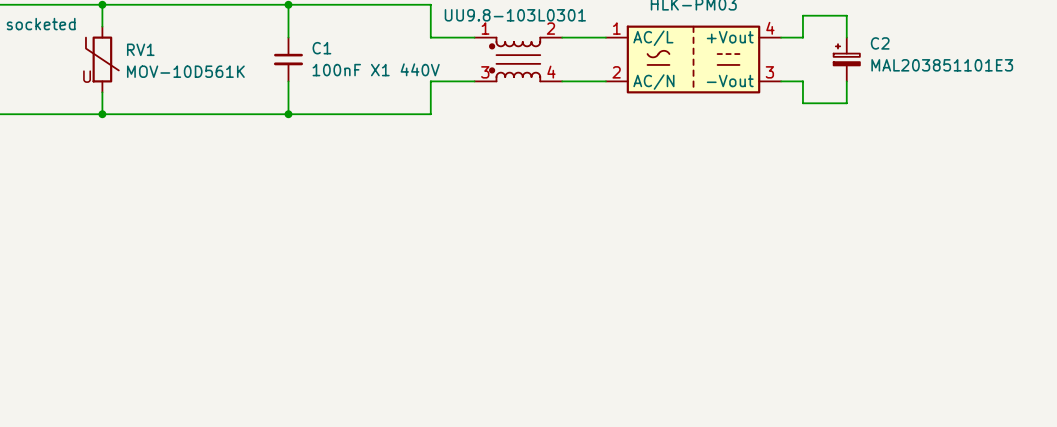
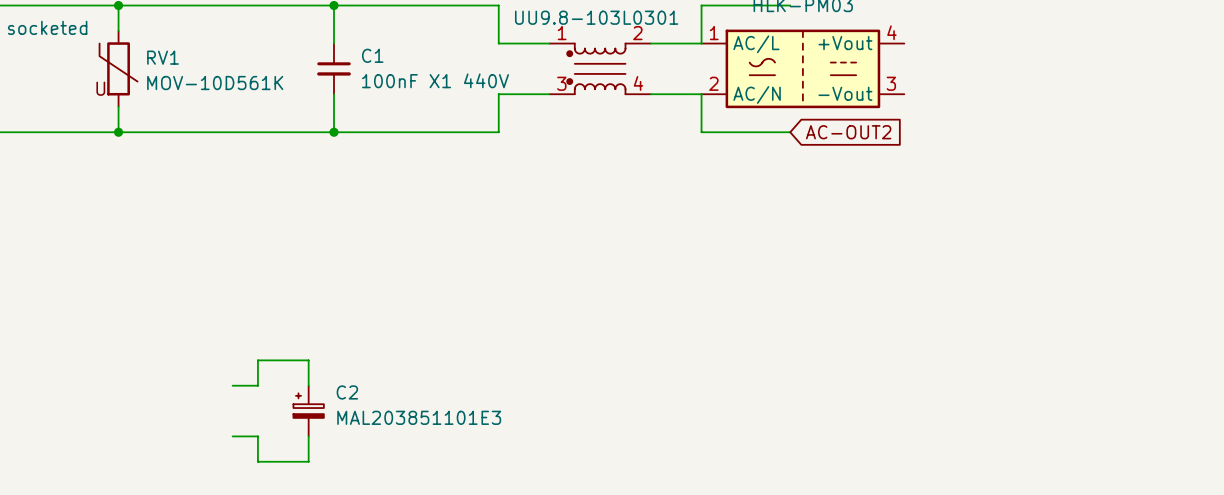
wire: none -> (790, 5) (701, 5) (701, 43)
wire: (781, 37) (802, 37) (802, 15) (846, 15) (846, 37) -> none
C2 position: (846, 59) -> (308, 411)
wire: none -> (701, 94) (701, 132) (790, 132)
wire: (781, 81) (802, 81) (802, 103) (846, 103) (846, 81) -> none
global label: none -> AC-OUT2 (848, 132)
wire: none -> (232, 385) (257, 385) (257, 360) (308, 360) (308, 385)
wire: none -> (232, 436) (257, 436) (257, 461) (308, 461) (308, 436)

